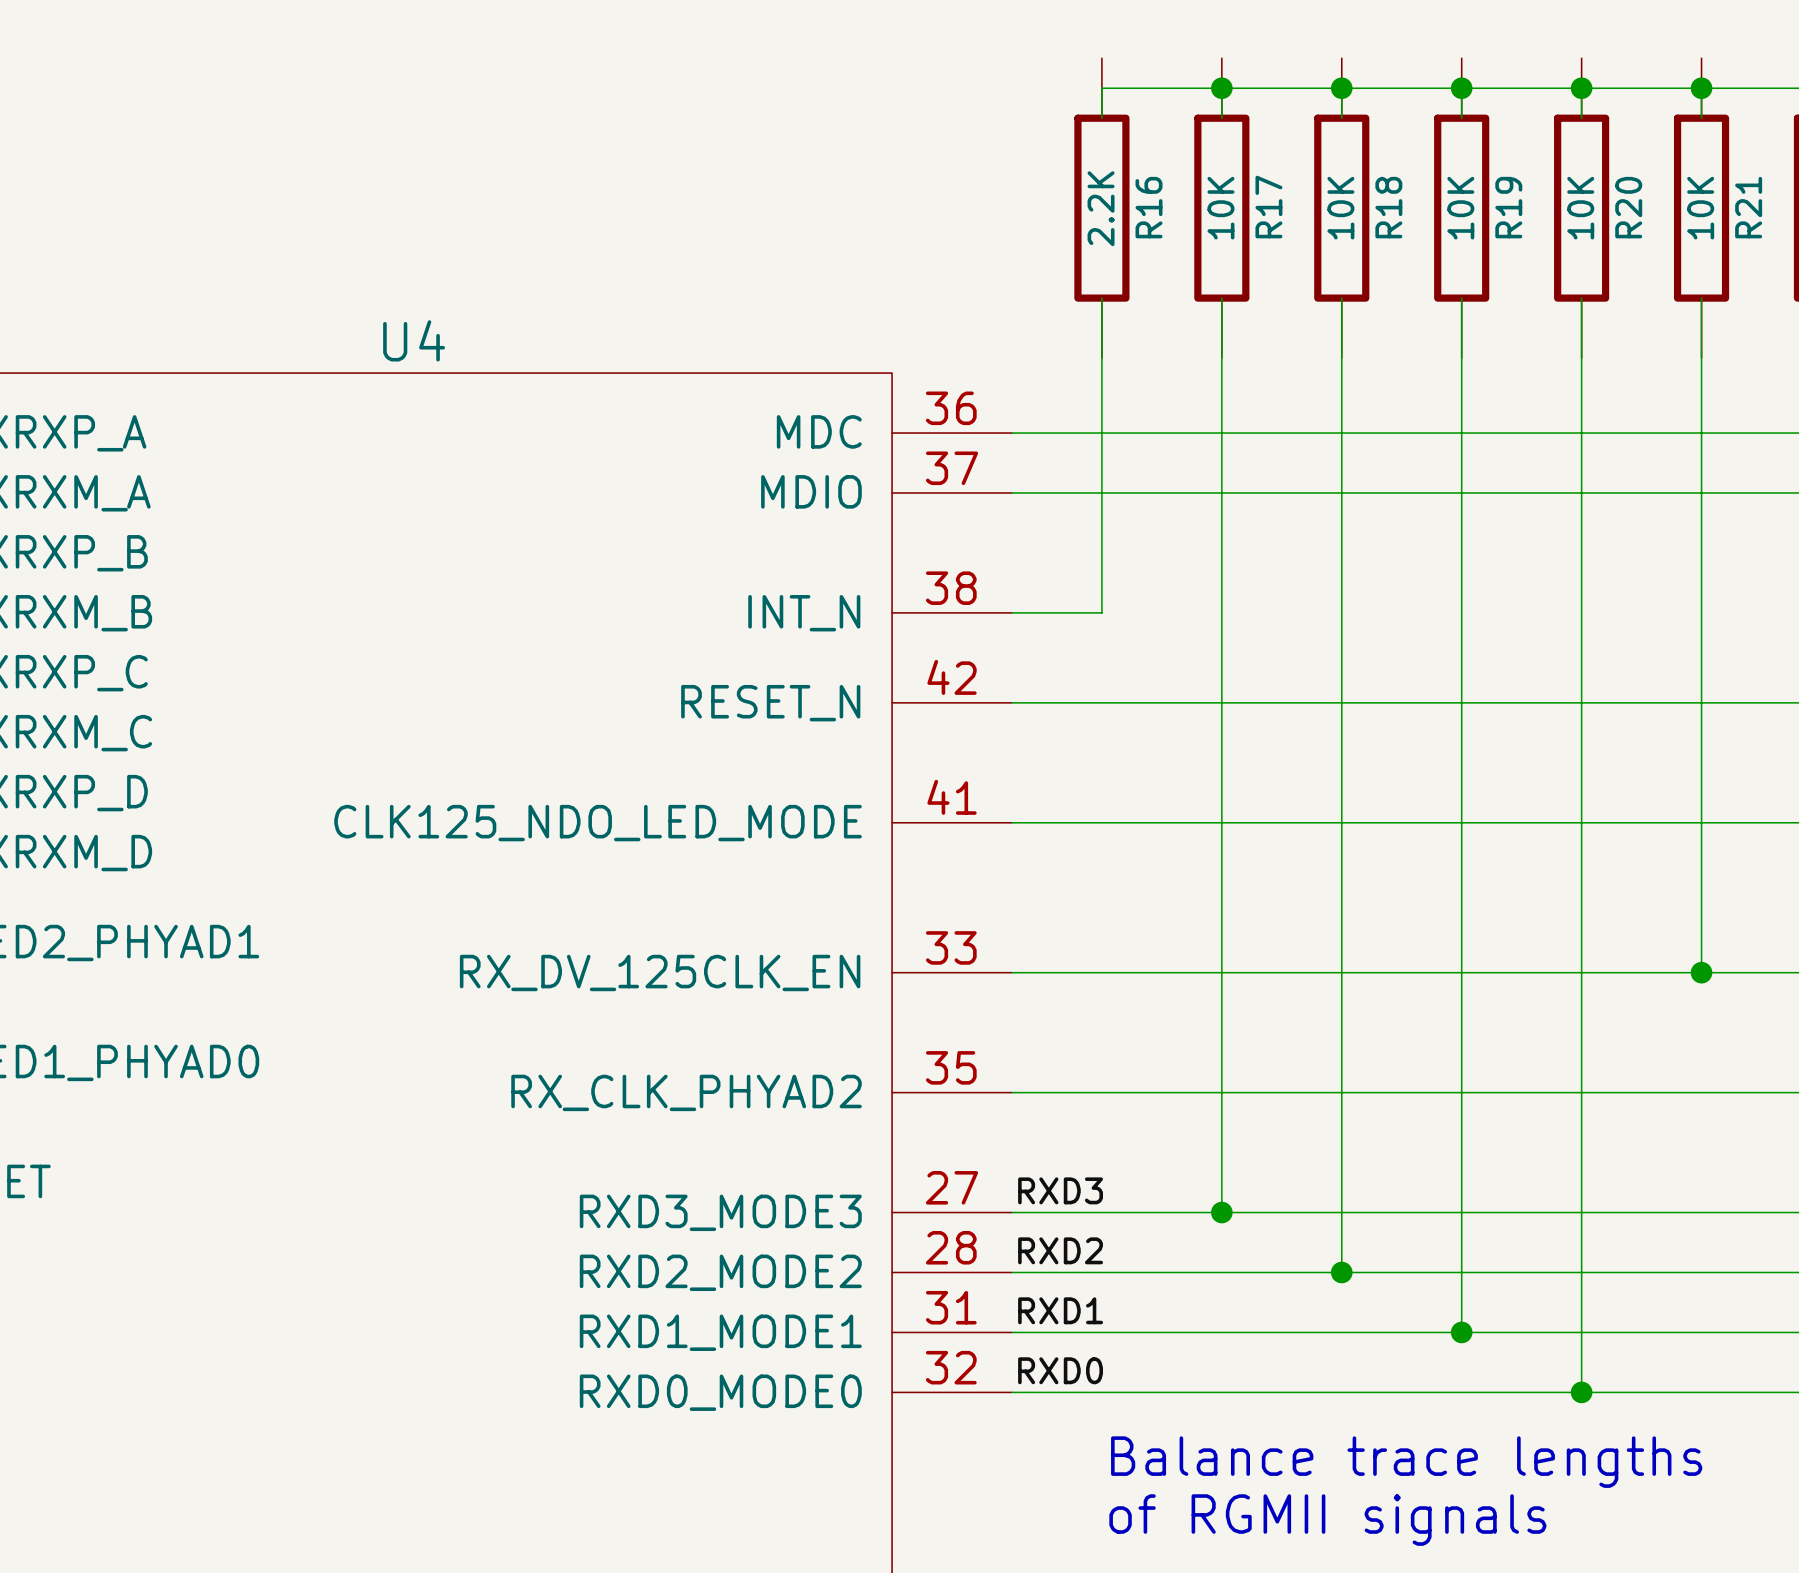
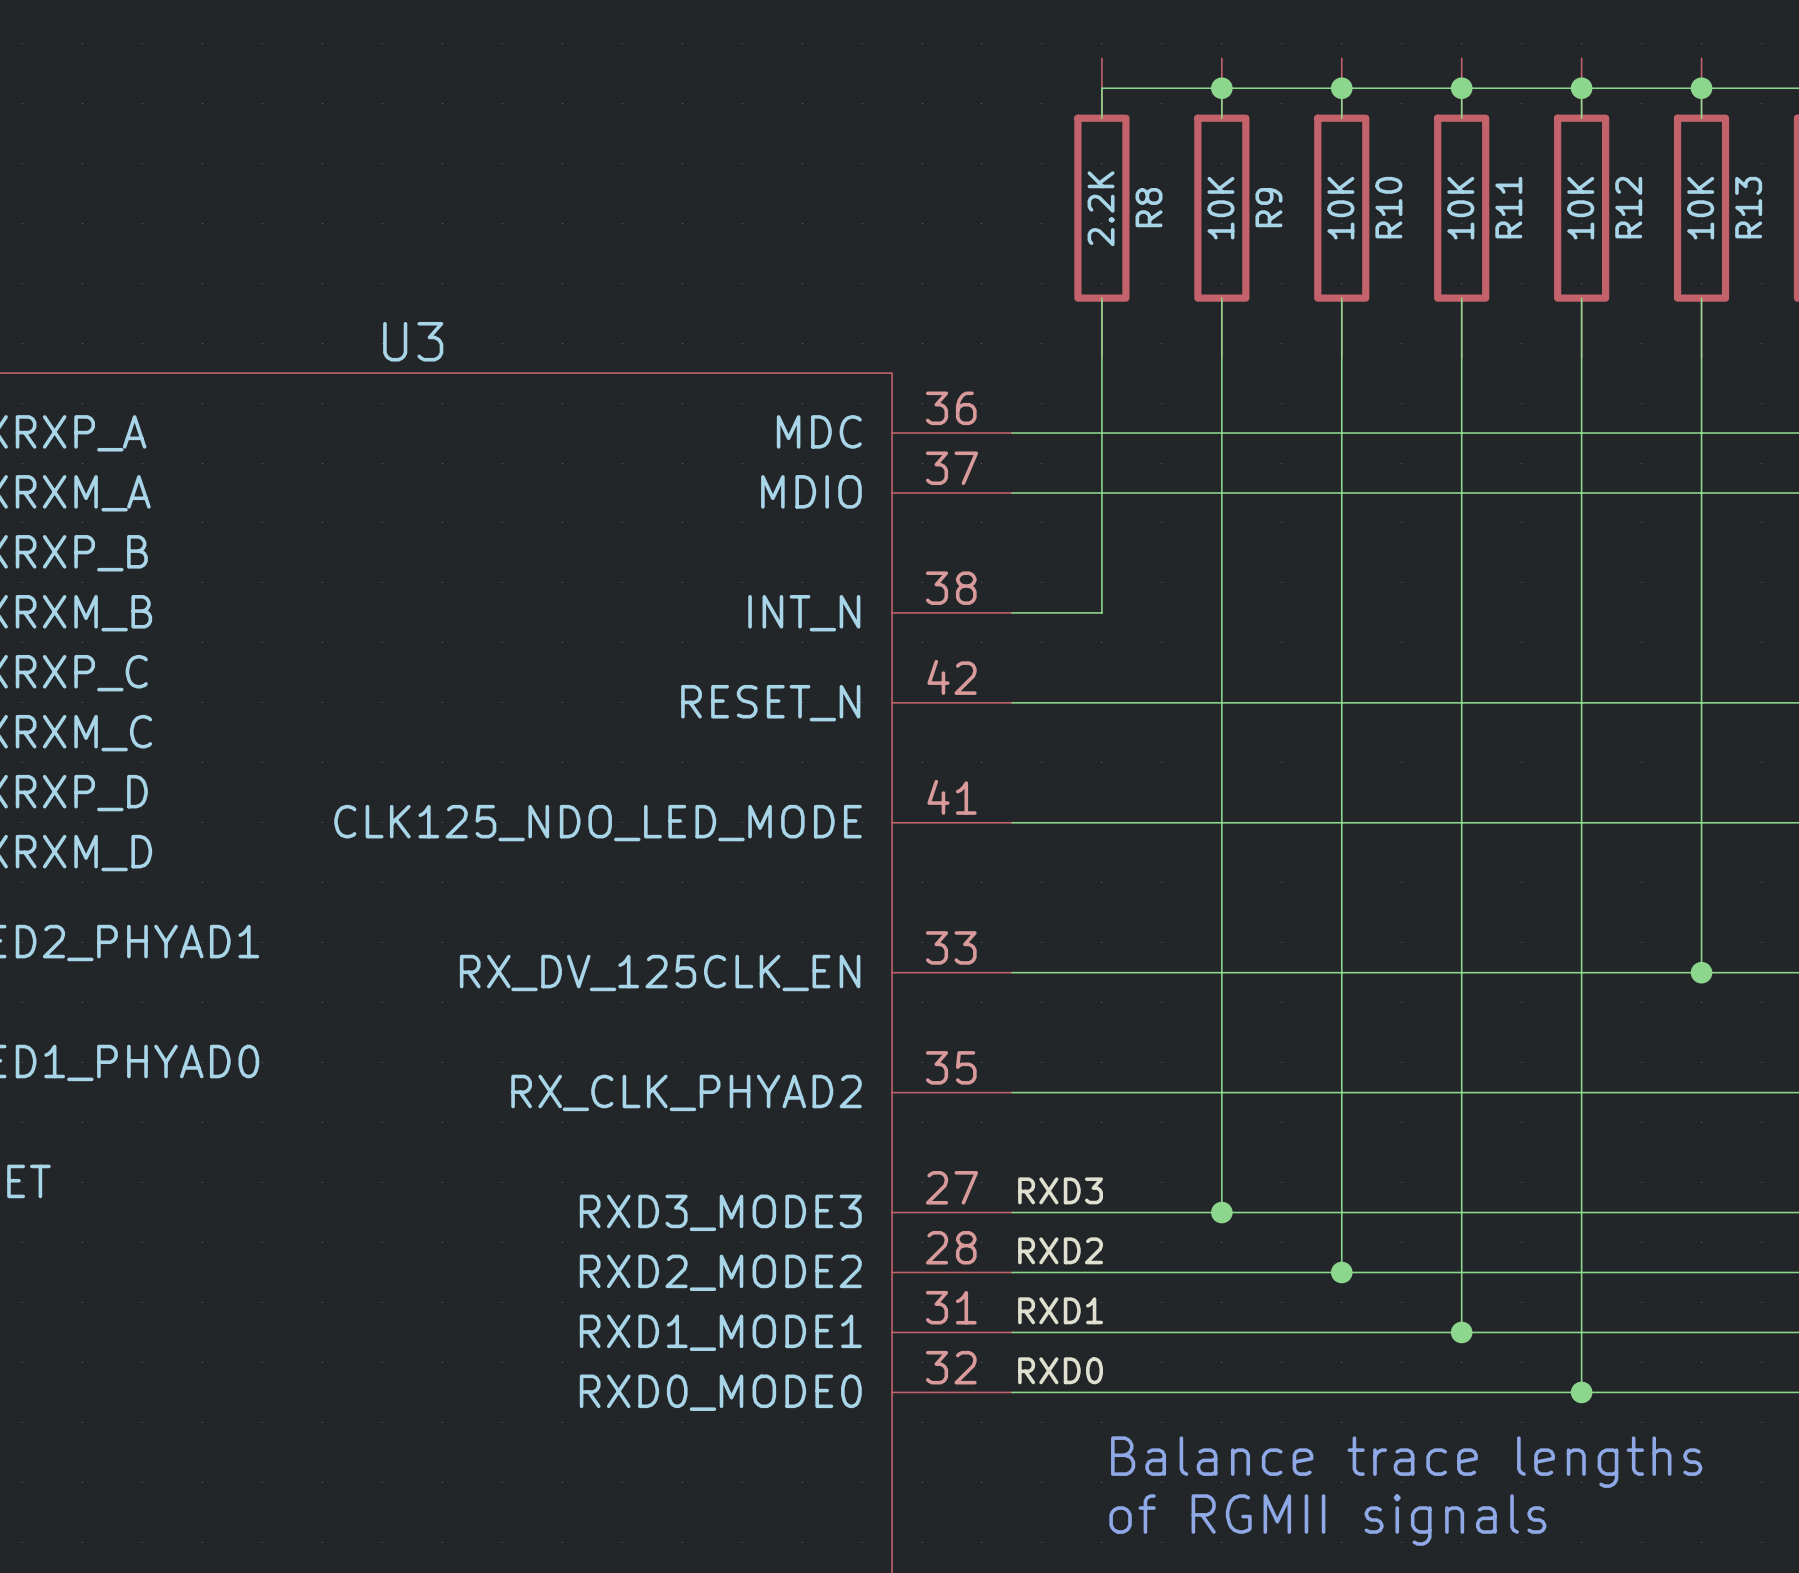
R16 name: R16 (1149, 207) -> R8 (1149, 207)
R17 name: R17 (1268, 207) -> R9 (1268, 207)
R18 name: R18 (1388, 207) -> R10 (1388, 207)
R19 name: R19 (1508, 207) -> R11 (1508, 207)
R20 name: R20 (1628, 207) -> R12 (1628, 207)
R21 name: R21 (1748, 207) -> R13 (1748, 207)
U4 name: U4 (414, 340) -> U3 (413, 341)

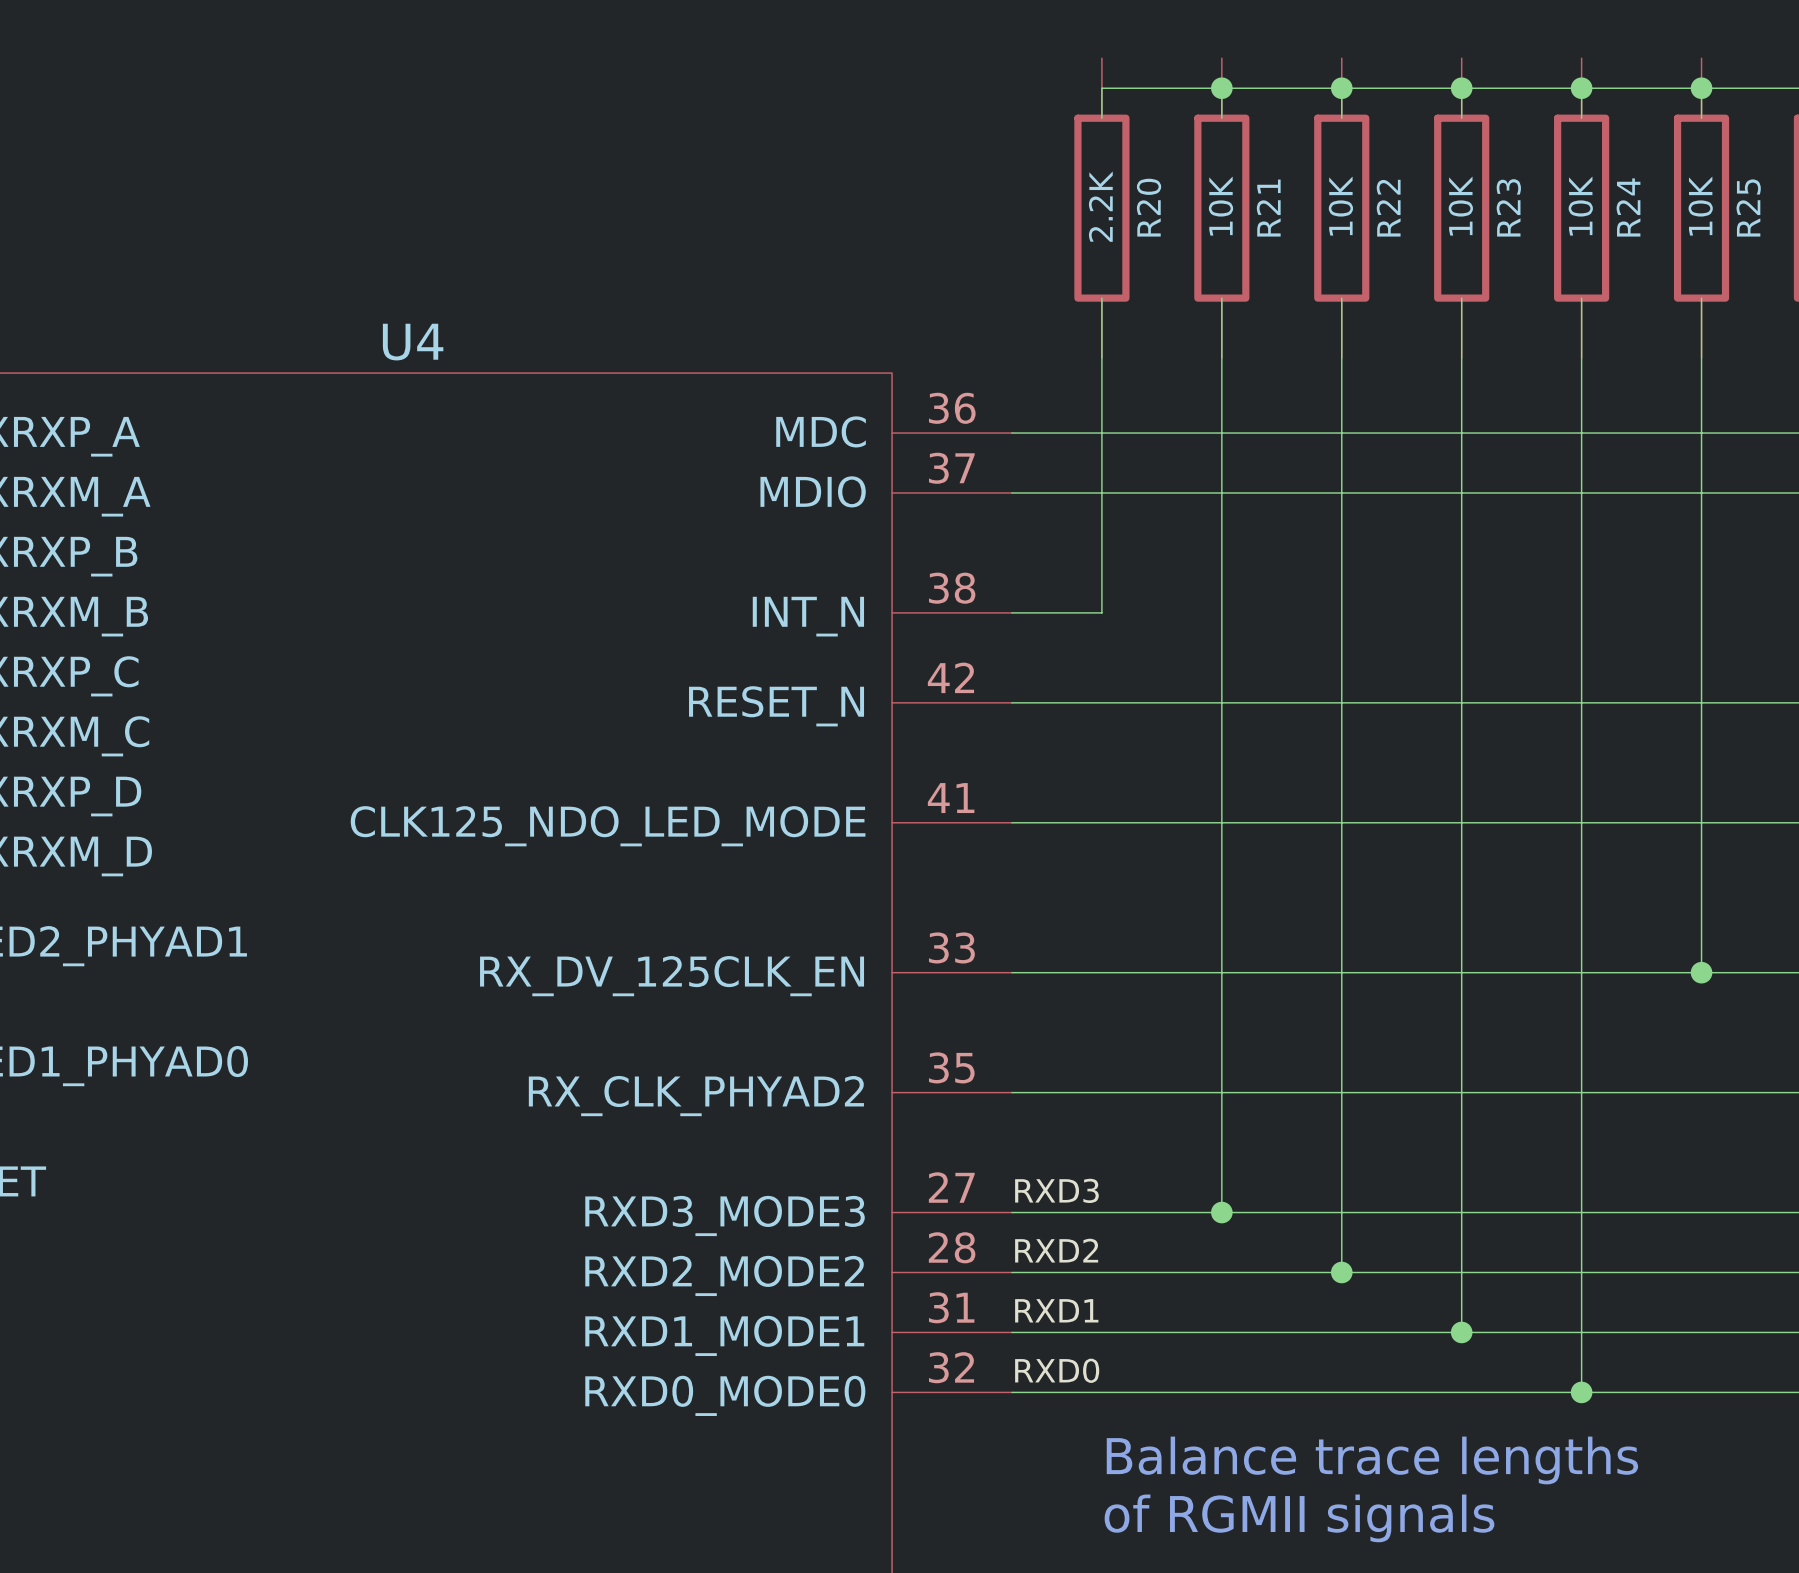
R8 name: R8 (1149, 207) -> R20 (1149, 207)
R9 name: R9 (1268, 207) -> R21 (1268, 208)
R10 name: R10 (1388, 207) -> R22 (1388, 208)
R11 name: R11 (1508, 207) -> R23 (1508, 207)
R12 name: R12 (1628, 207) -> R24 (1628, 207)
R13 name: R13 (1748, 207) -> R25 (1748, 207)
U3 name: U3 (413, 341) -> U4 (413, 342)

